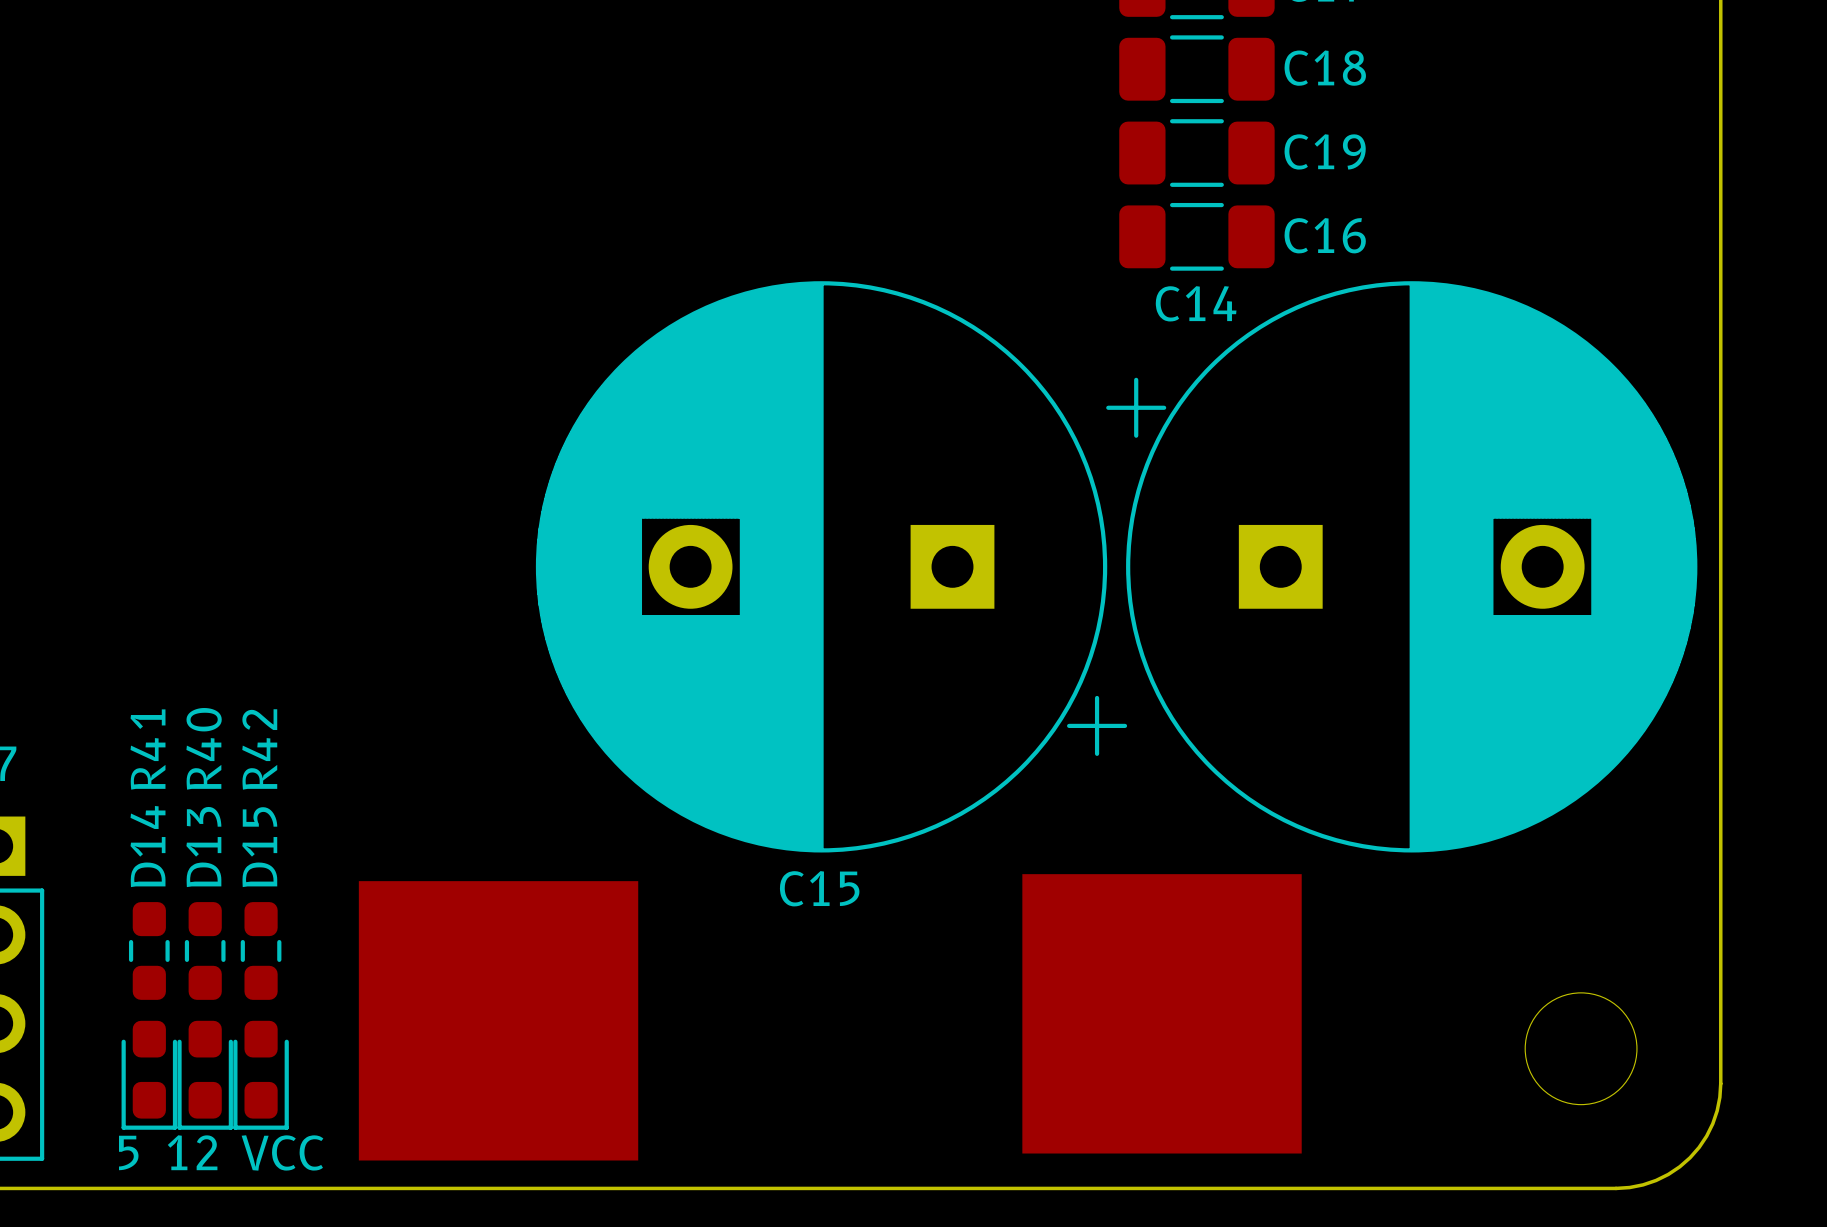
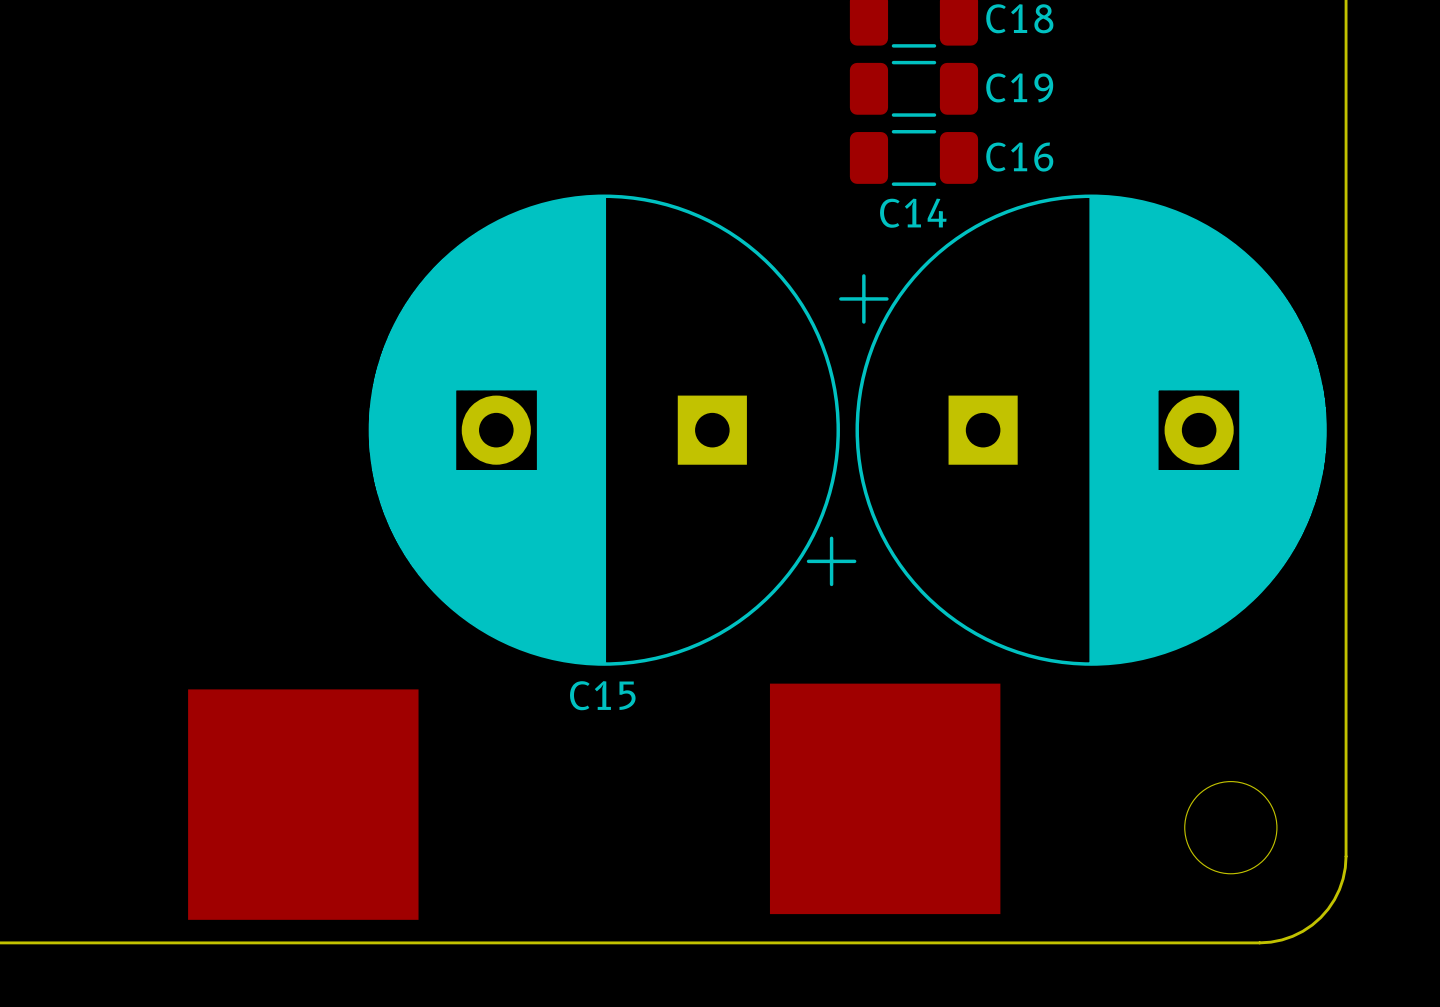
R41: (149, 950) -> none
R40: (205, 950) -> none
R42: (261, 950) -> none
part position: (498, 1020) -> (303, 804)
D14: (149, 1075) -> none
D13: (205, 1075) -> none
D15: (261, 1075) -> none
text: 5 (128, 1152) -> none
text: 12 (192, 1152) -> none
text: VCC (282, 1152) -> none

